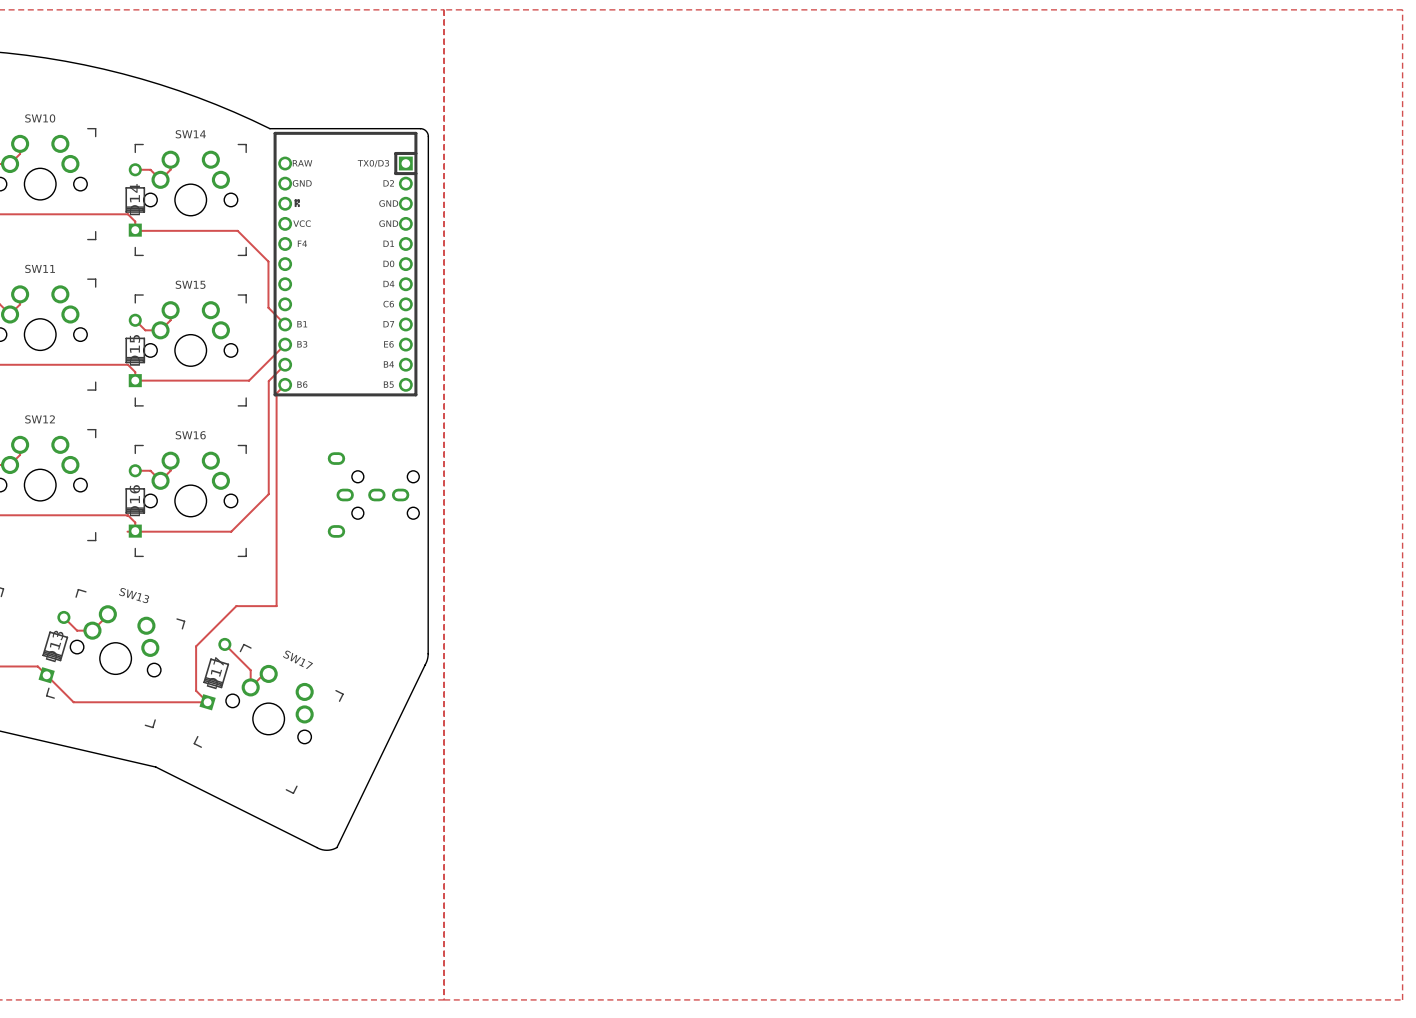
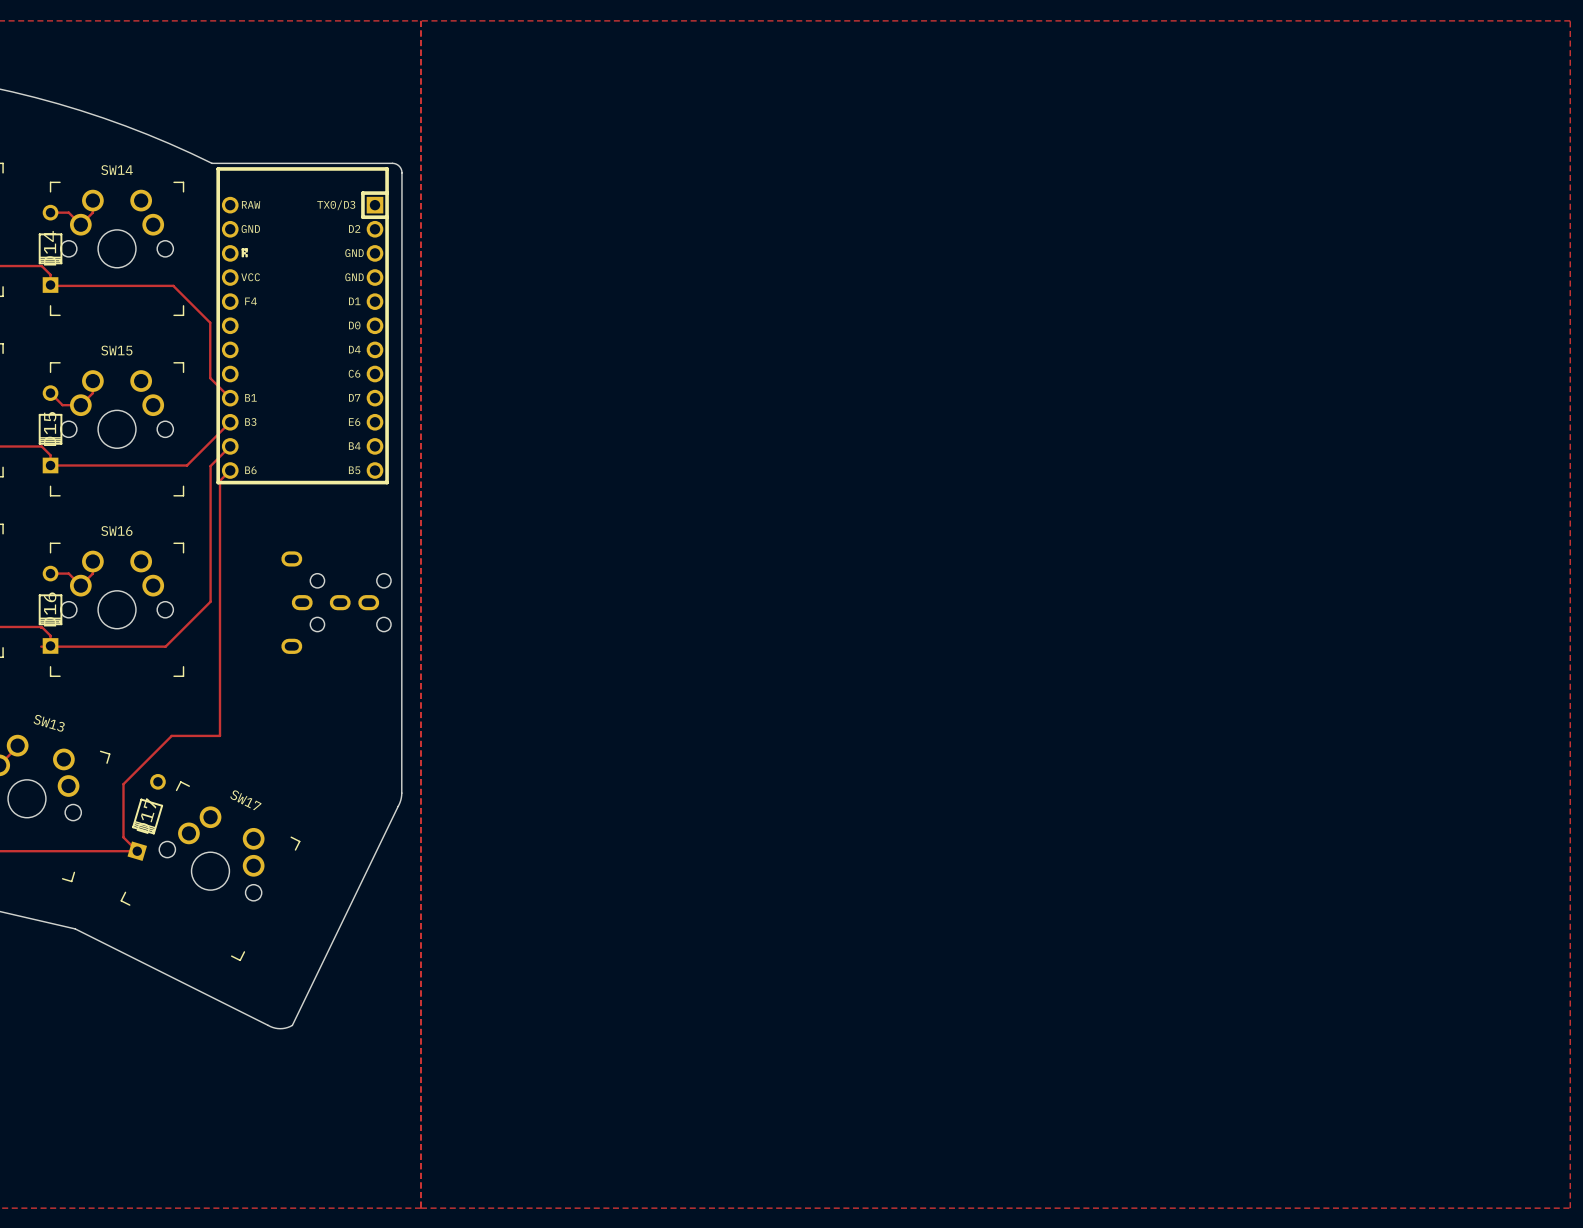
track: (224, 644) (250, 670) (250, 687) (264, 673) (268, 673) -> none

